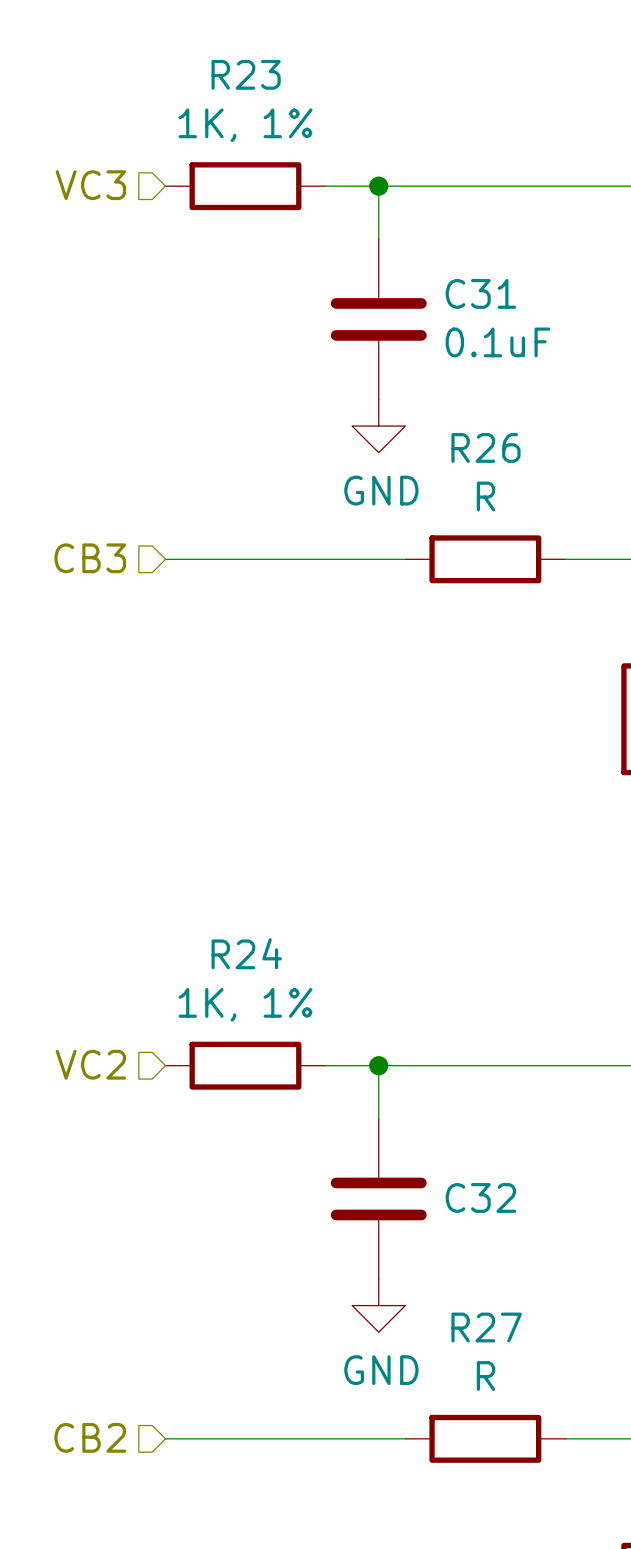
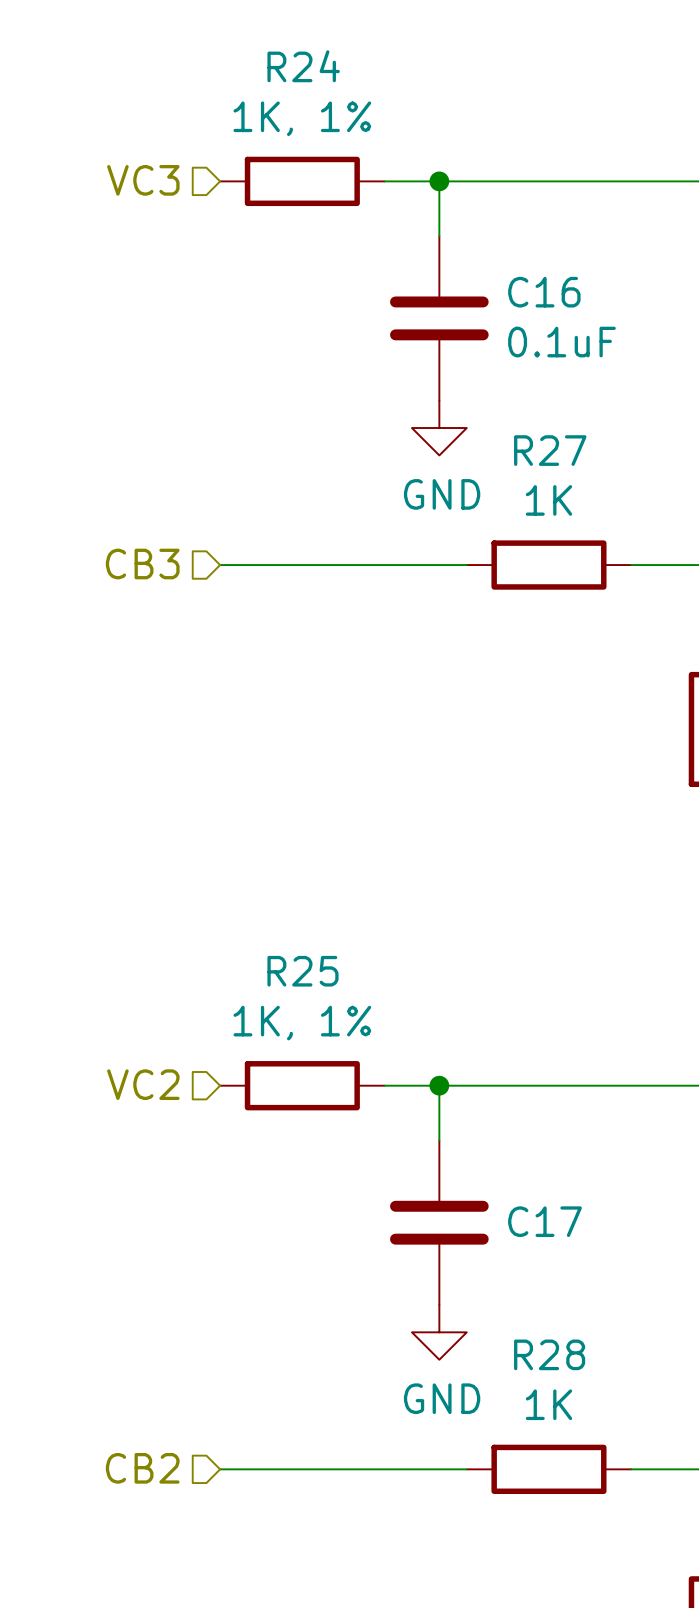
R23 name: R23 (246, 74) -> R24 (303, 66)
C31 name: C31 (480, 293) -> C16 (544, 292)
R26 name: R26 (485, 447) -> R27 (550, 450)
R26 value: R (485, 496) -> 1K (548, 500)
R24 name: R24 (246, 953) -> R25 (302, 971)
C32 name: C32 (480, 1197) -> C17 (545, 1221)
R27 name: R27 (486, 1327) -> R28 (549, 1354)
R27 value: R (485, 1376) -> 1K (548, 1404)

